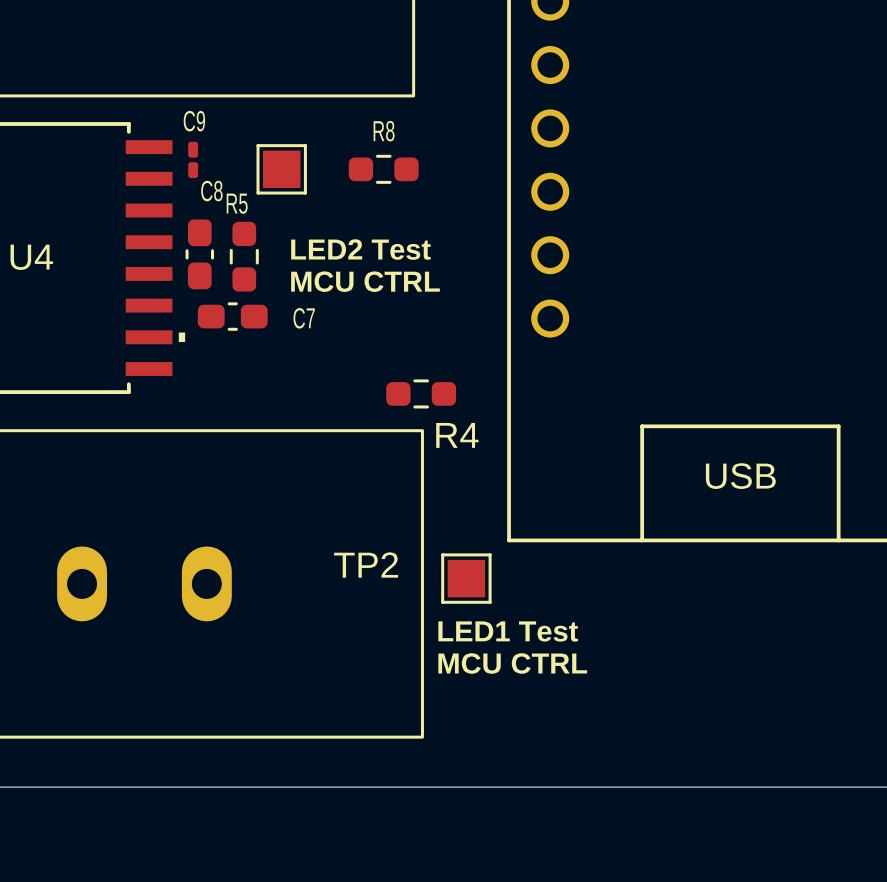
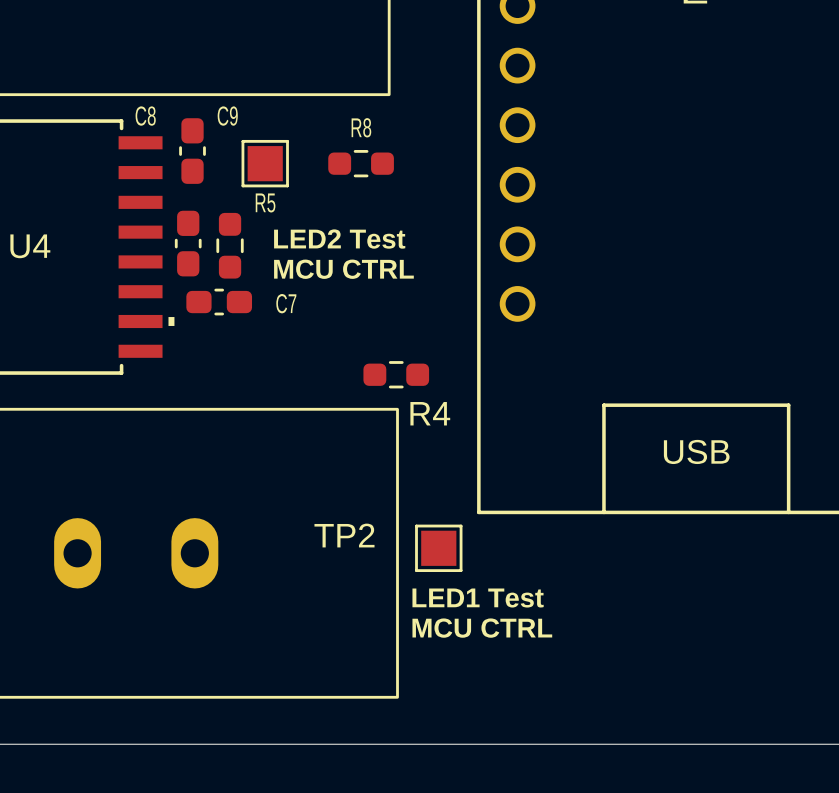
C9 footprint: [188, 141, 199, 179] -> [179, 118, 206, 184]
C8 name position: C8 (211, 191) -> C8 (145, 116)
R5 name position: R5 (237, 203) -> R5 (265, 202)

